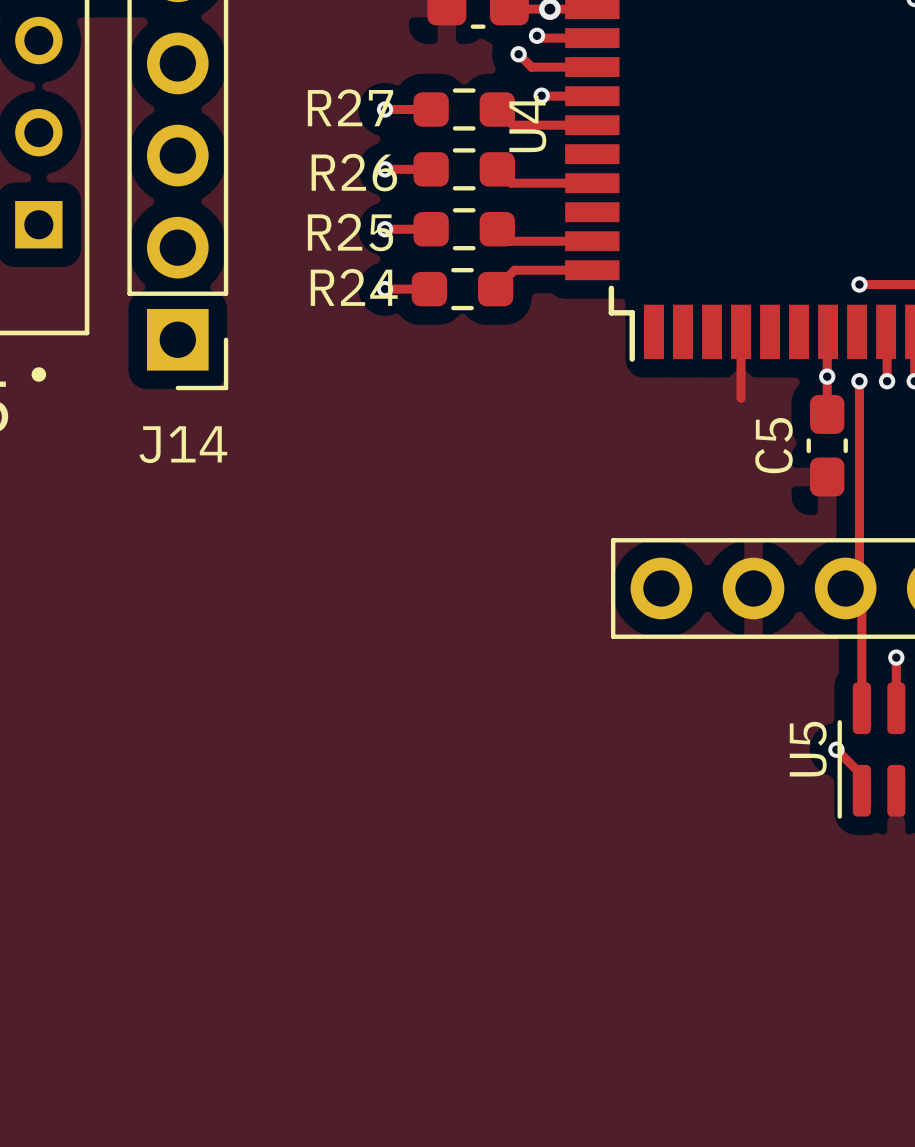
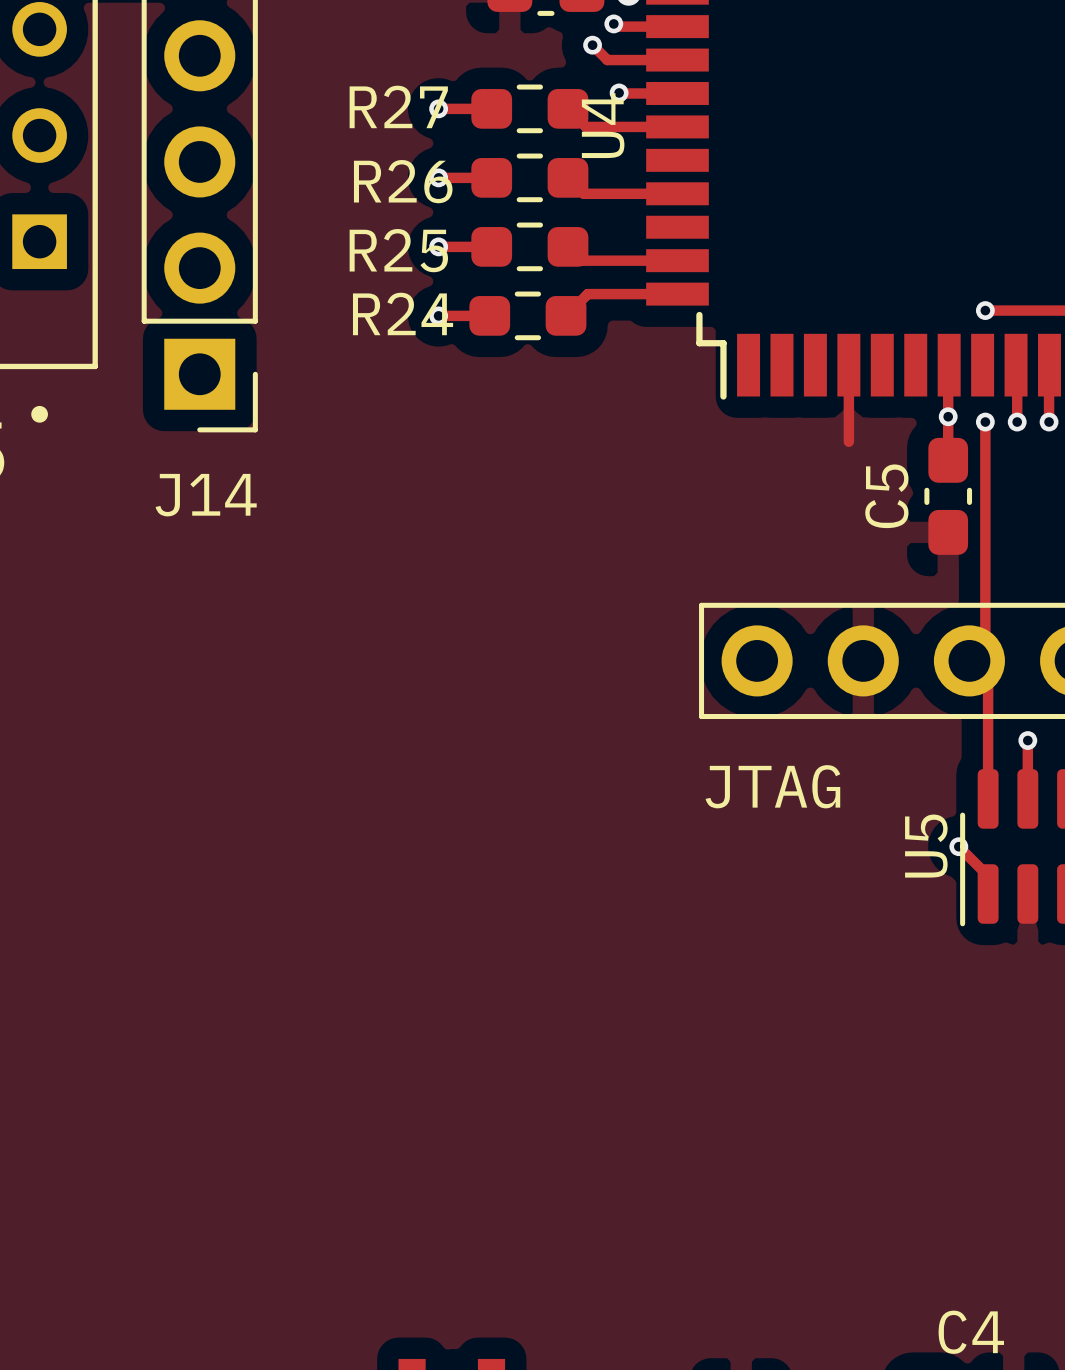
text: none -> JTAG (772, 786)

